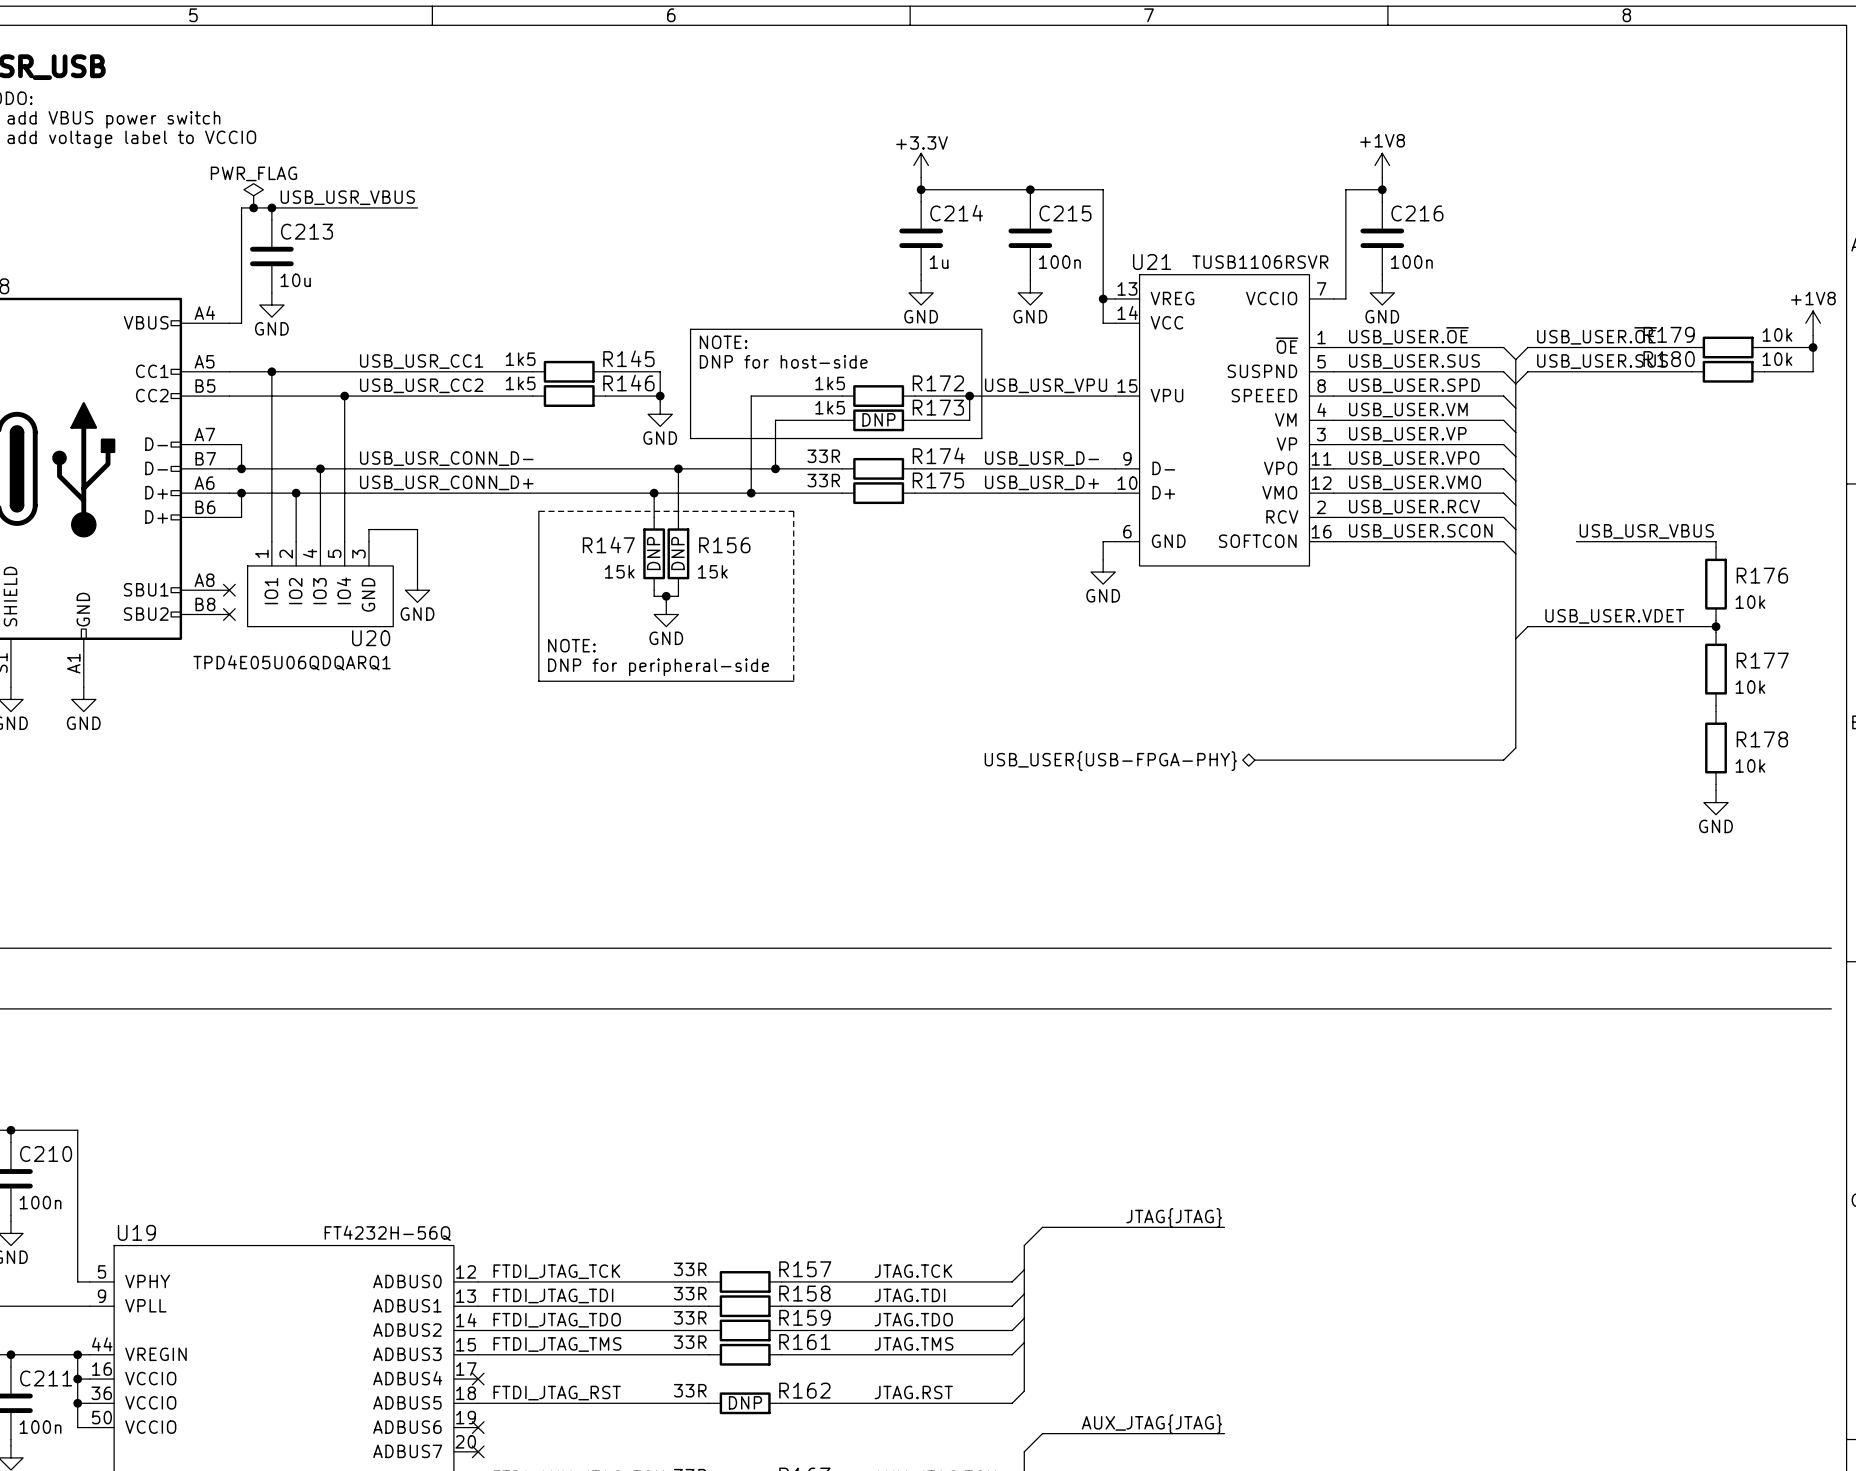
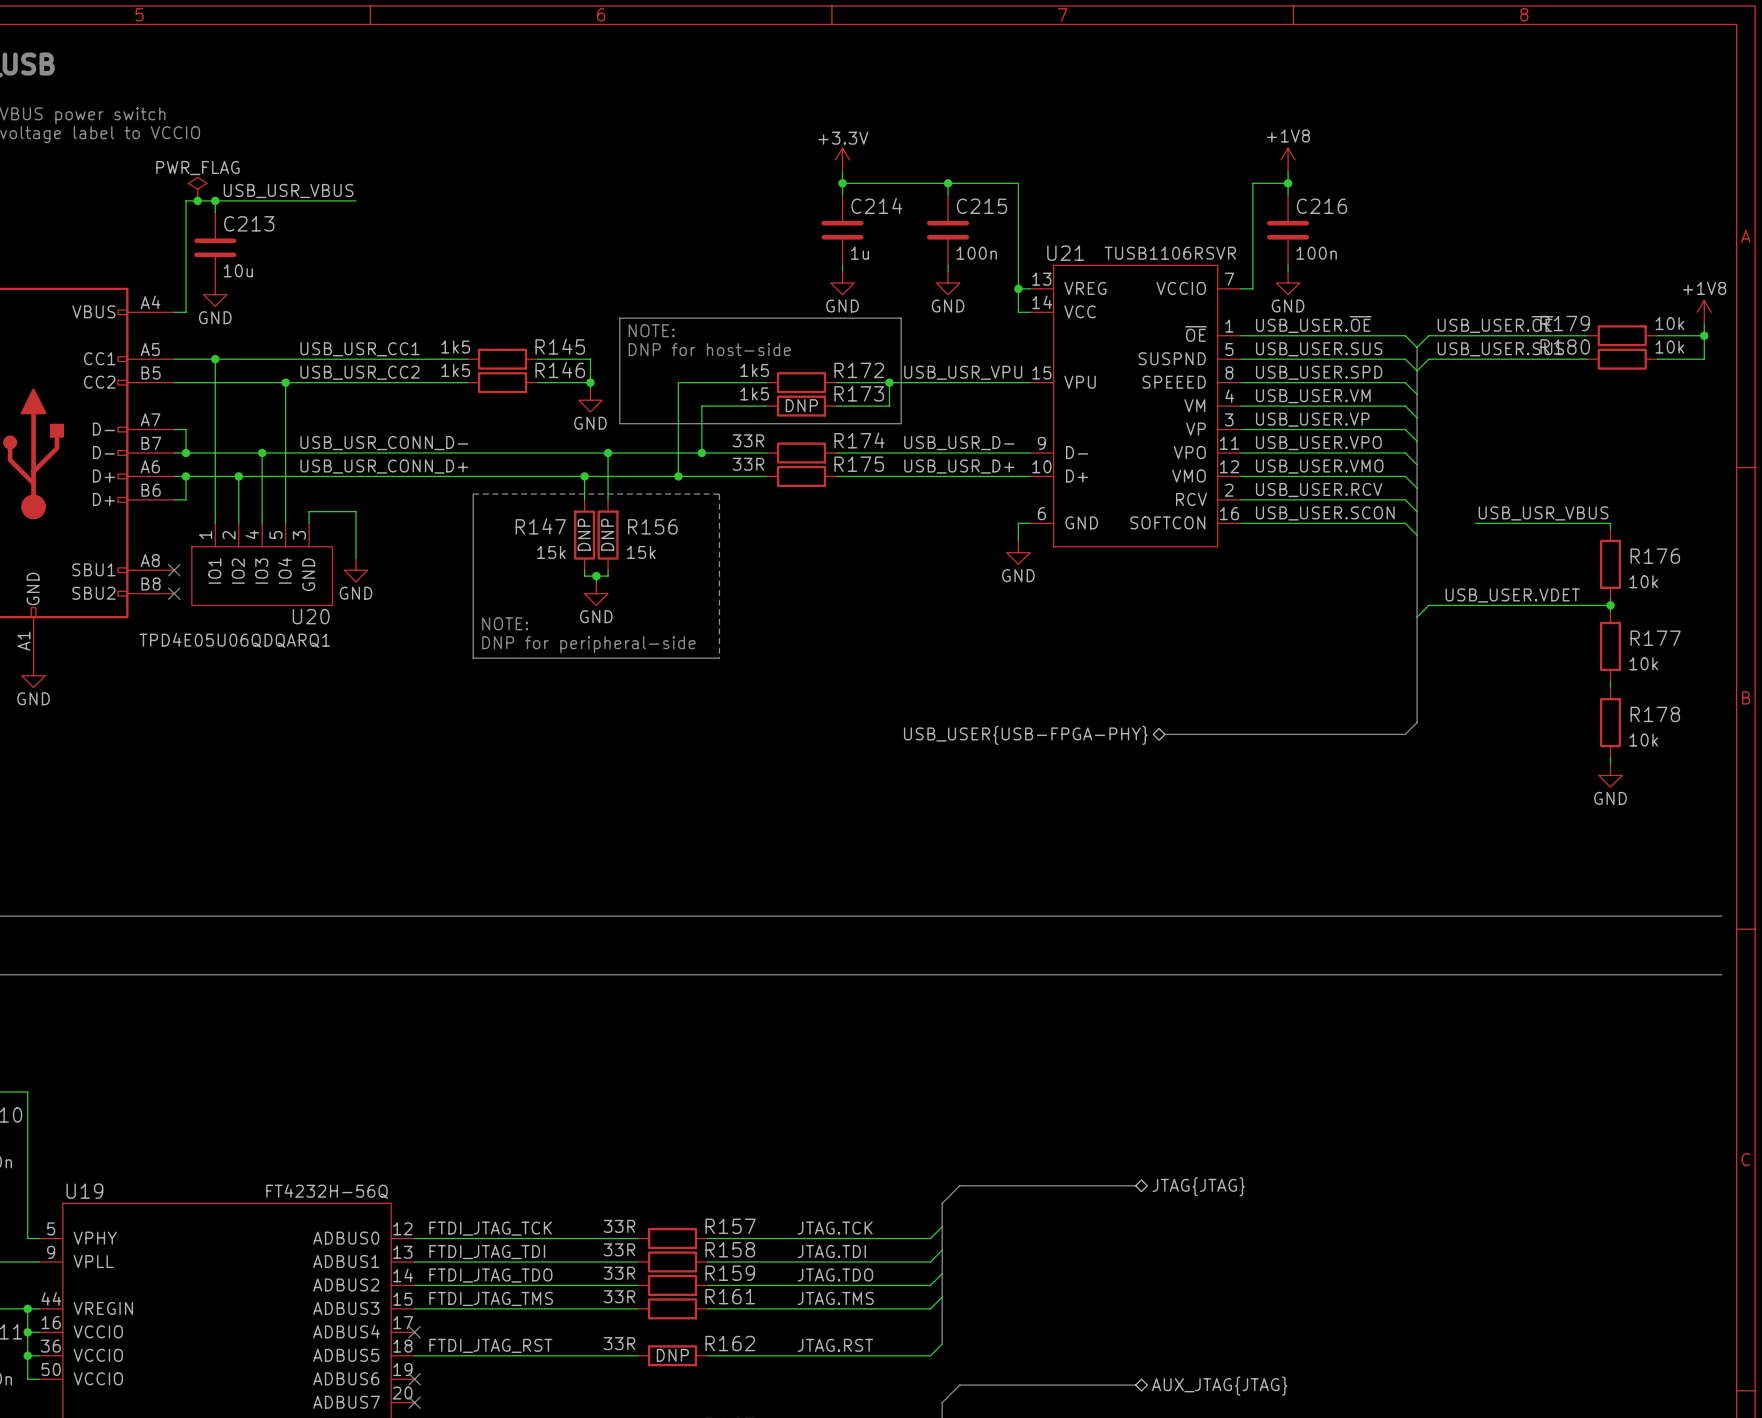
label: JTAG{JTAG} (1174, 1217) -> none
hierarchical label: none -> JTAG{JTAG} (1198, 1186)
label: AUX_JTAG{JTAG} (1151, 1424) -> none
hierarchical label: none -> AUX_JTAG{JTAG} (1219, 1386)

